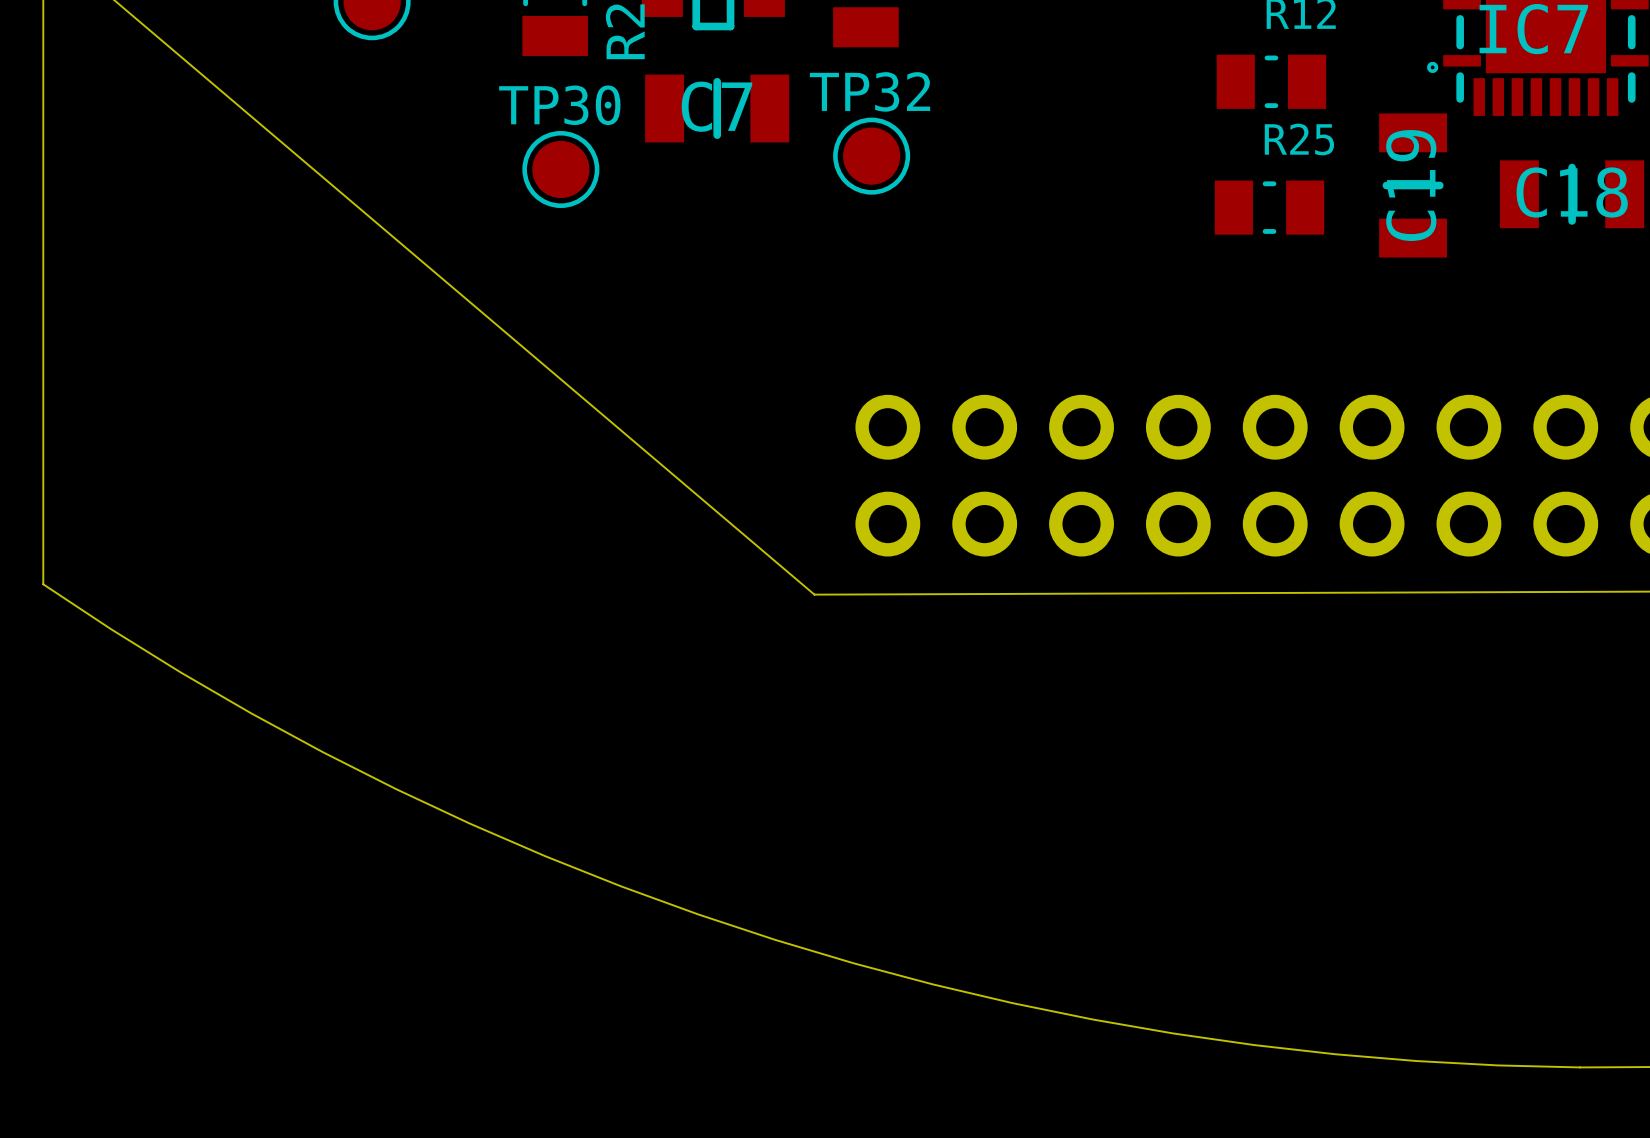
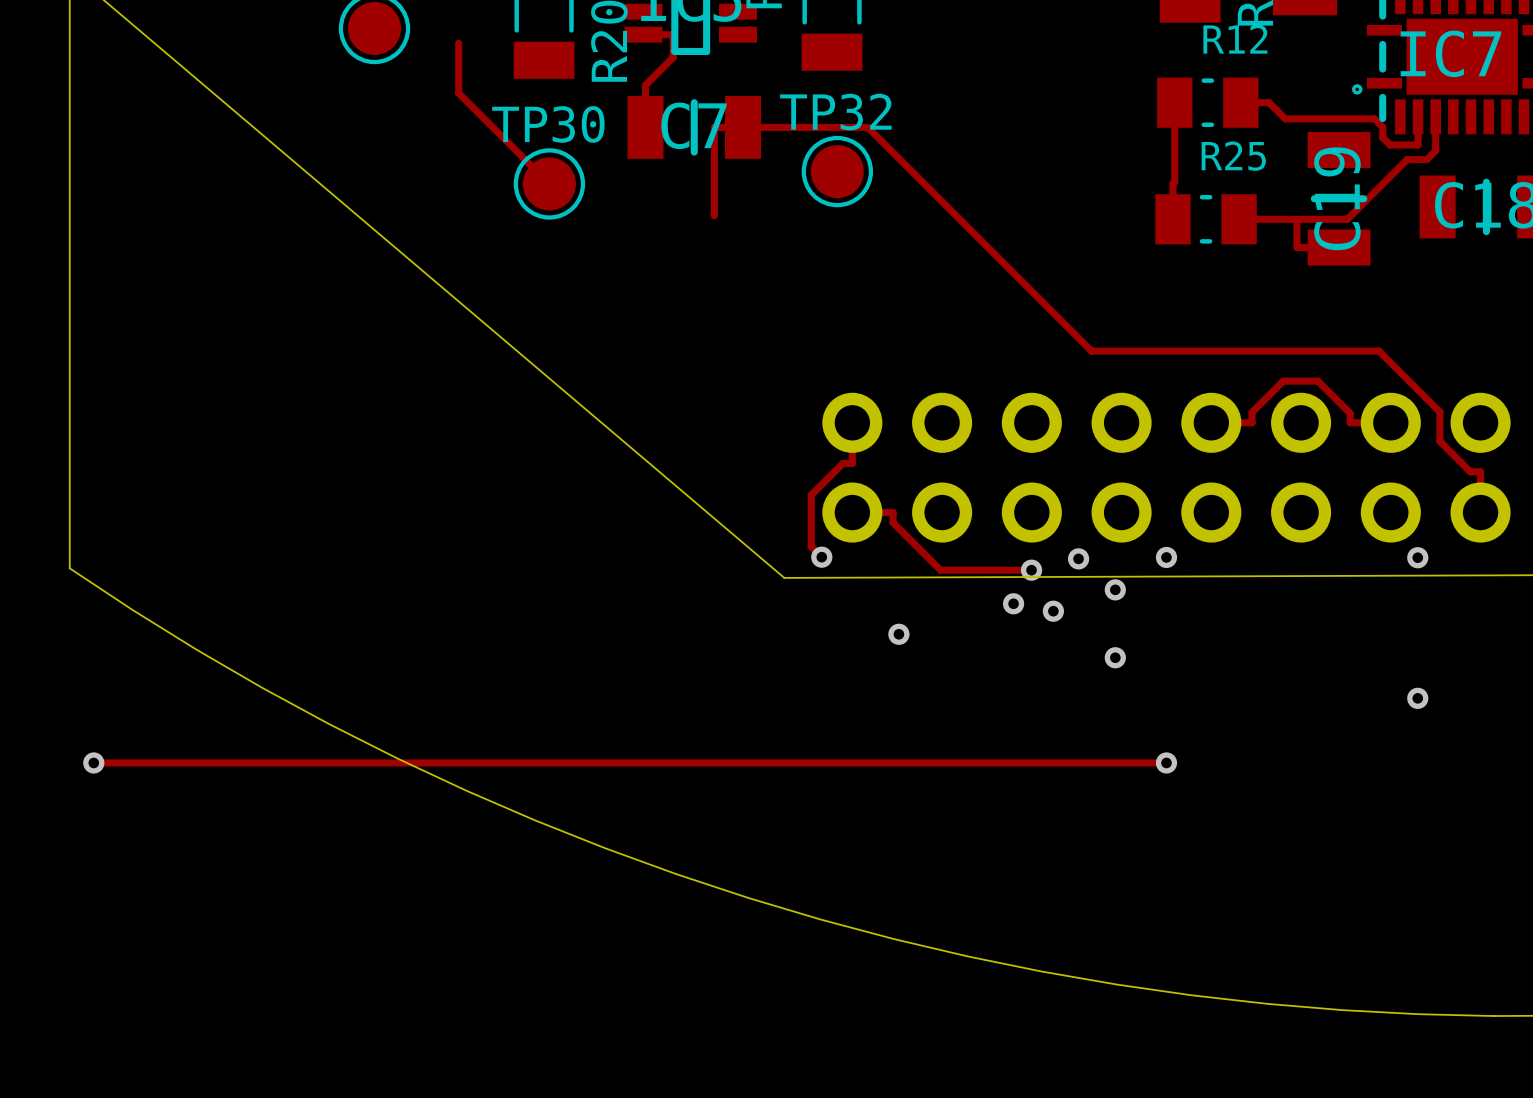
track: none -> (643, 34) (673, 34) (673, 57) (645, 85) (645, 127)
track: none -> (458, 43) (458, 93) (549, 183)
track: none -> (1174, 102) (1173, 219)
track: none -> (1240, 102) (1269, 102) (1285, 118) (1374, 118) (1382, 127) (1382, 137) (1390, 144) (1418, 144) (1418, 116)
track: none -> (1435, 116) (1435, 150) (1426, 159) (1407, 159) (1347, 219) (1239, 219)
track: none -> (714, 215) (714, 127) (867, 127) (1091, 351) (1379, 351) (1439, 411) (1439, 441) (1470, 471) (1480, 471) (1480, 512)
track: none -> (1296, 219) (1296, 247) (1339, 247)
track: none -> (852, 422) (852, 463) (842, 463) (811, 495) (811, 546) (821, 557)
track: none -> (1211, 422) (1252, 422) (1252, 412) (1283, 381) (1317, 381) (1350, 413) (1350, 422) (1390, 422)
track: none -> (852, 512) (893, 512) (893, 522) (940, 570) (1031, 570)
via: none -> (821, 557)
via: none -> (1166, 557)
via: none -> (1417, 557)
via: none -> (1078, 558)
via: none -> (1031, 570)
via: none -> (1115, 589)
via: none -> (1013, 603)
via: none -> (1053, 611)
via: none -> (898, 634)
via: none -> (1115, 657)
via: none -> (1417, 698)
track: none -> (93, 762) (1166, 762)
via: none -> (93, 762)
via: none -> (1166, 762)

